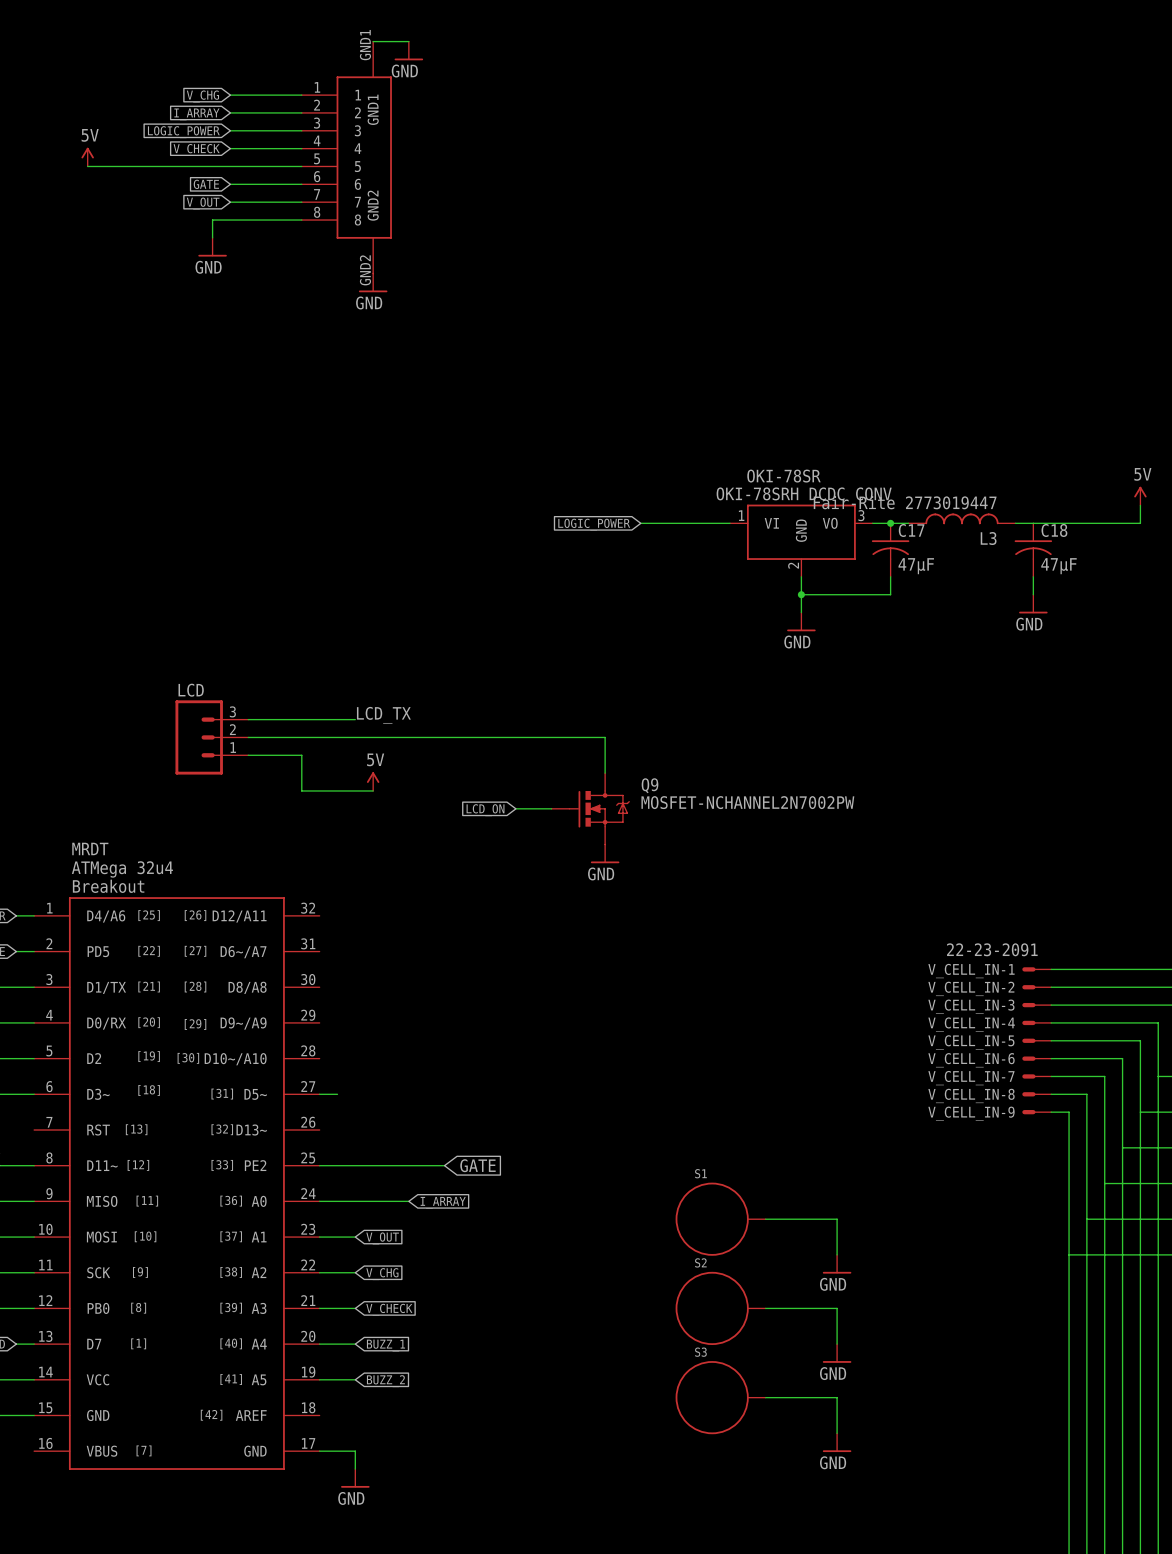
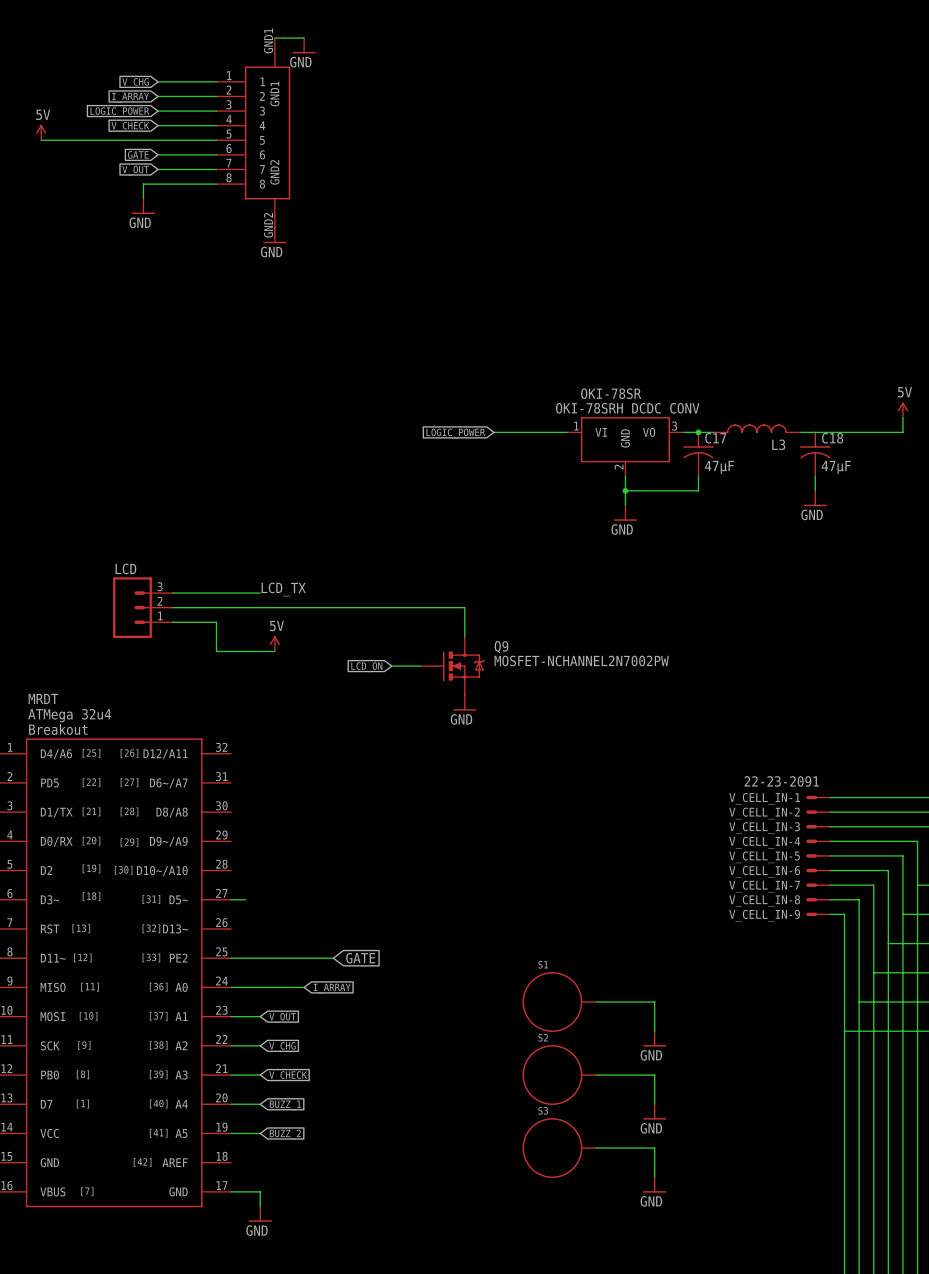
L3 value: Fair-Rite 2773019447 (905, 502) -> none

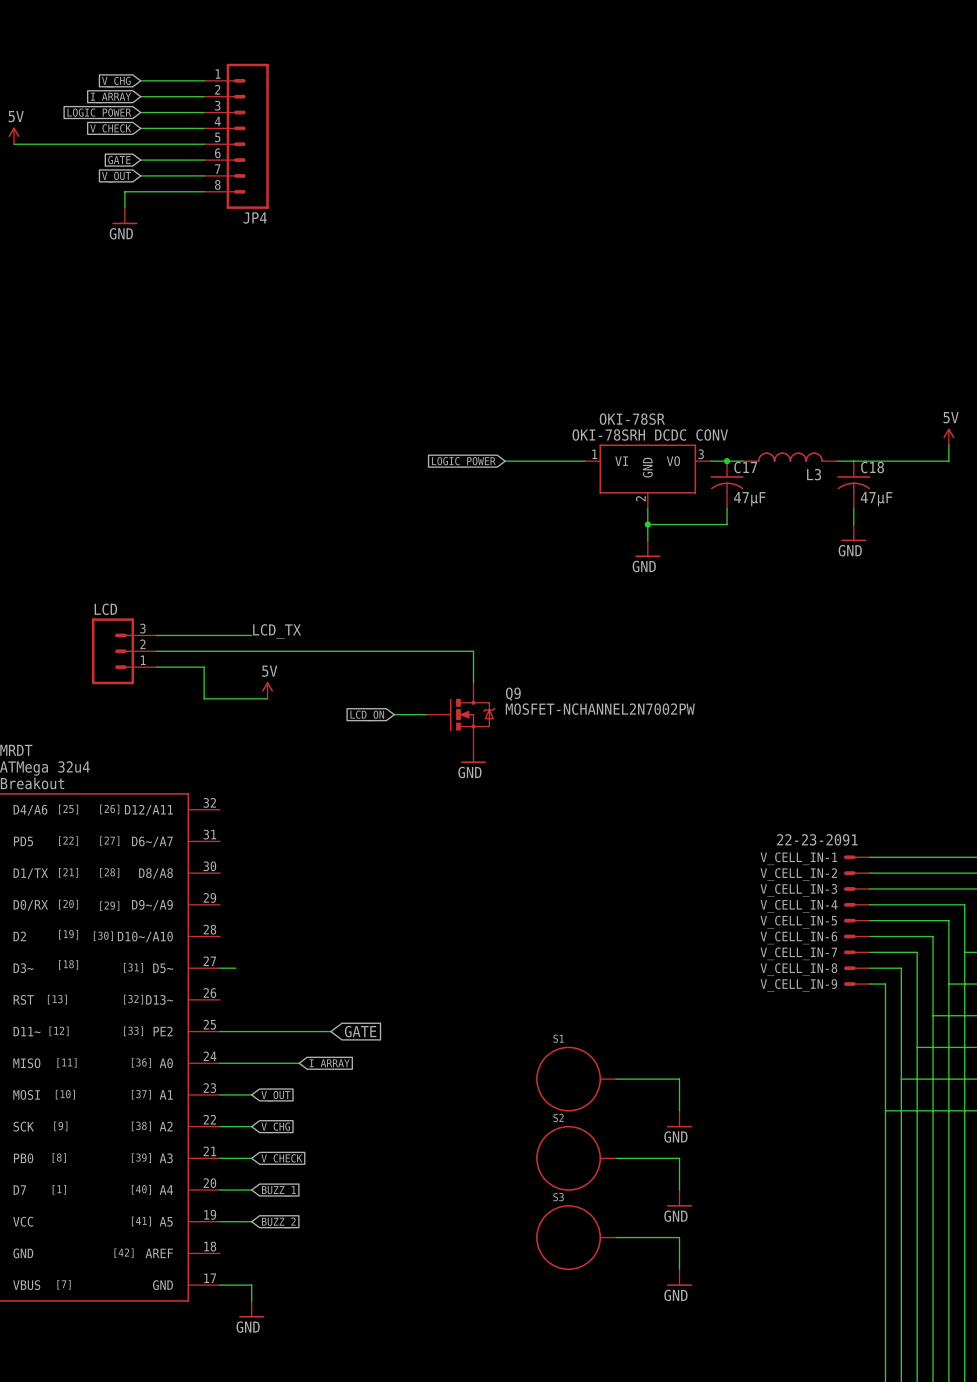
wire: (274, 38) (304, 38) -> none
power symbol: GND (304, 45) -> none
JP4: none -> (236, 136)
part: (253, 132) -> none
power symbol: GND (274, 235) -> none

